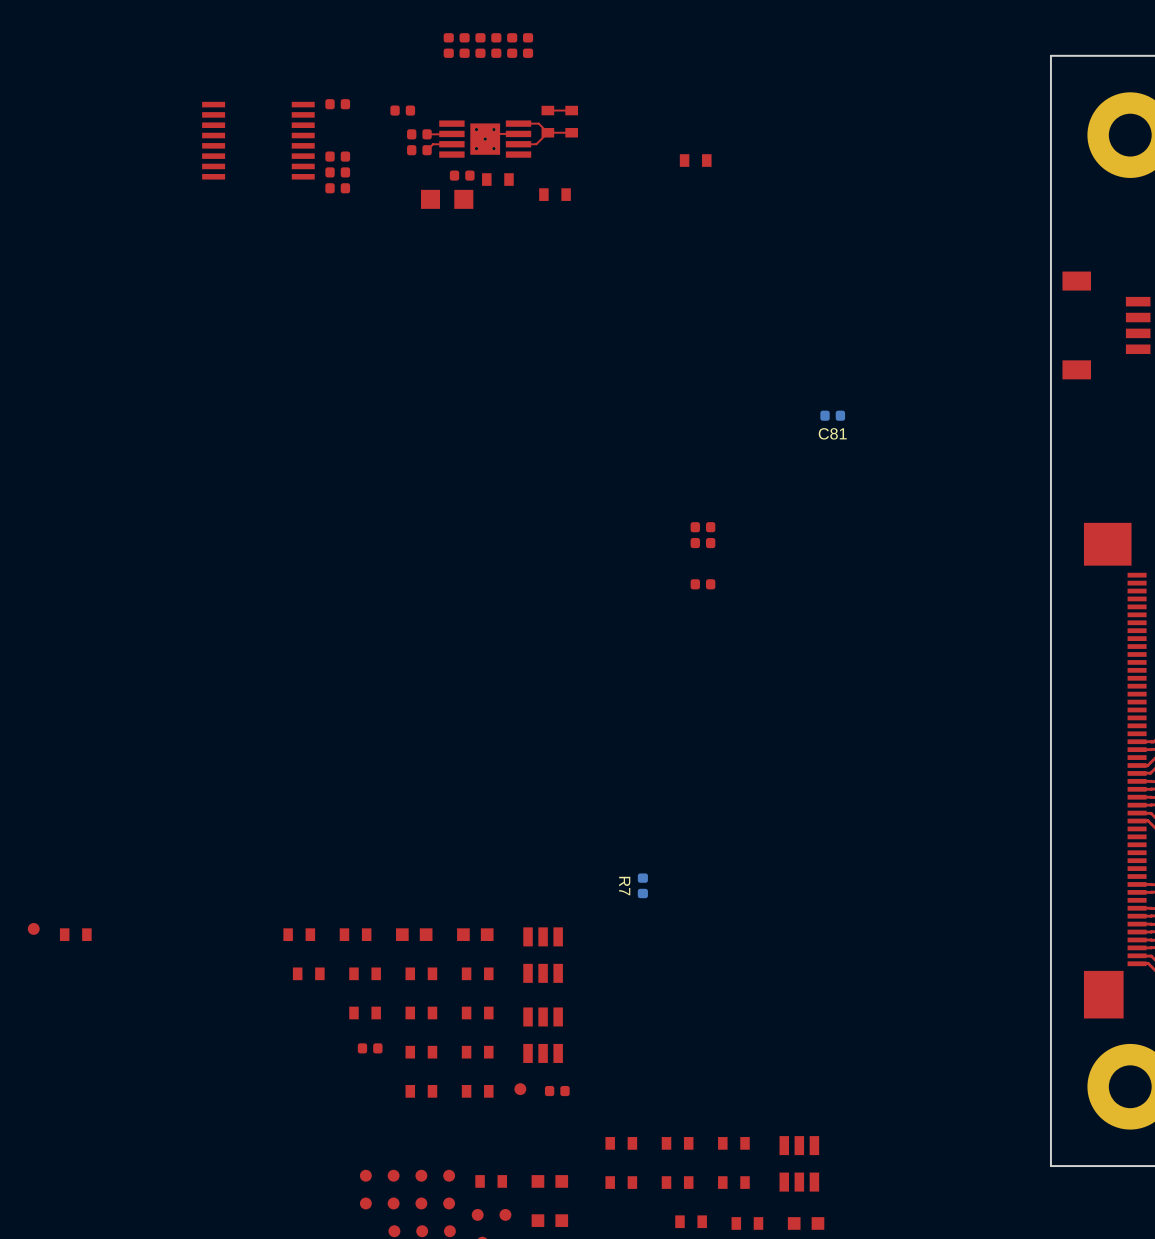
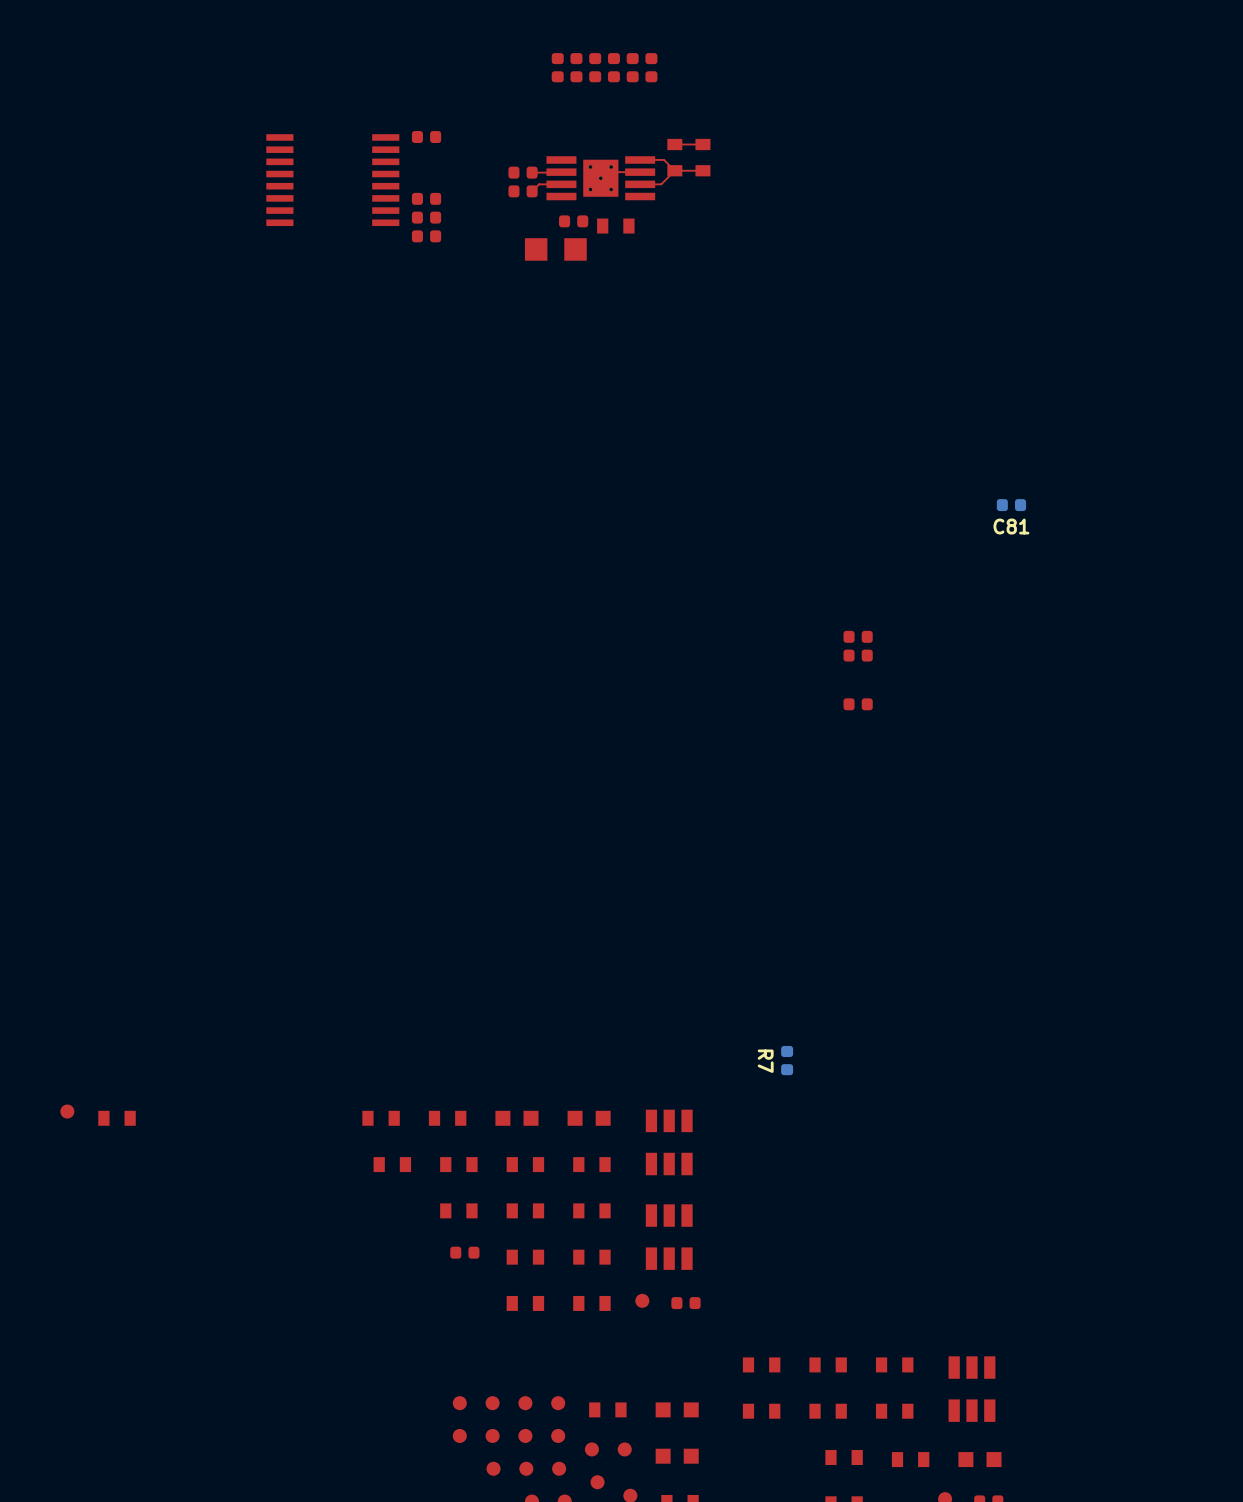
part: (402, 110) -> none
part: (695, 160) -> none
part: (555, 194) -> none

